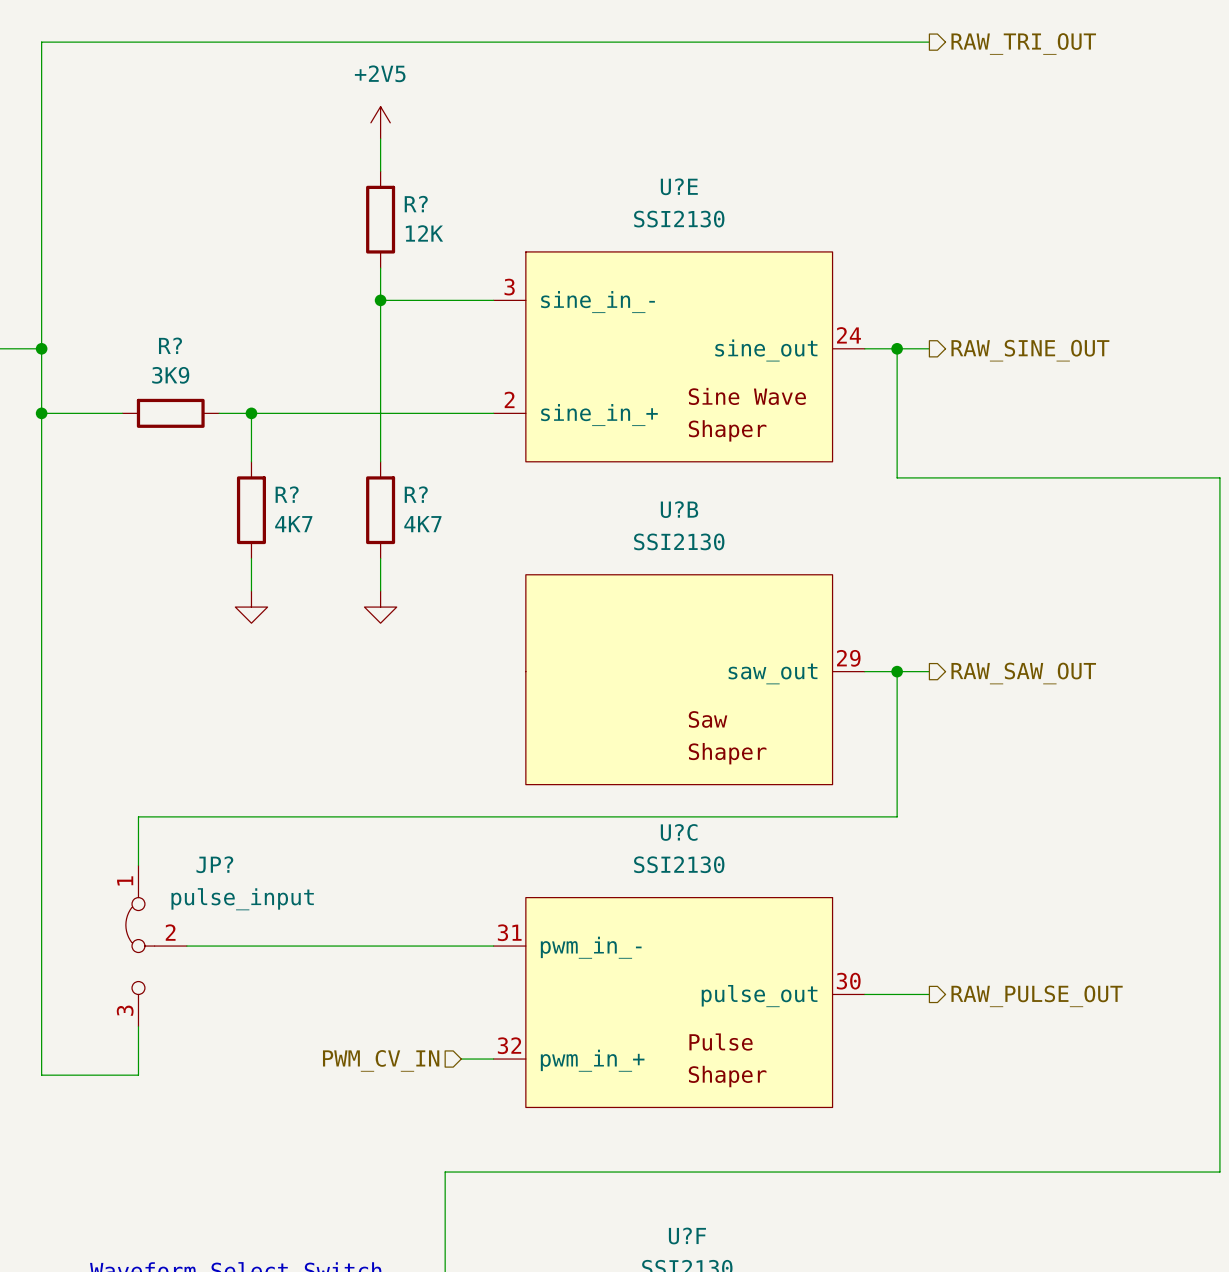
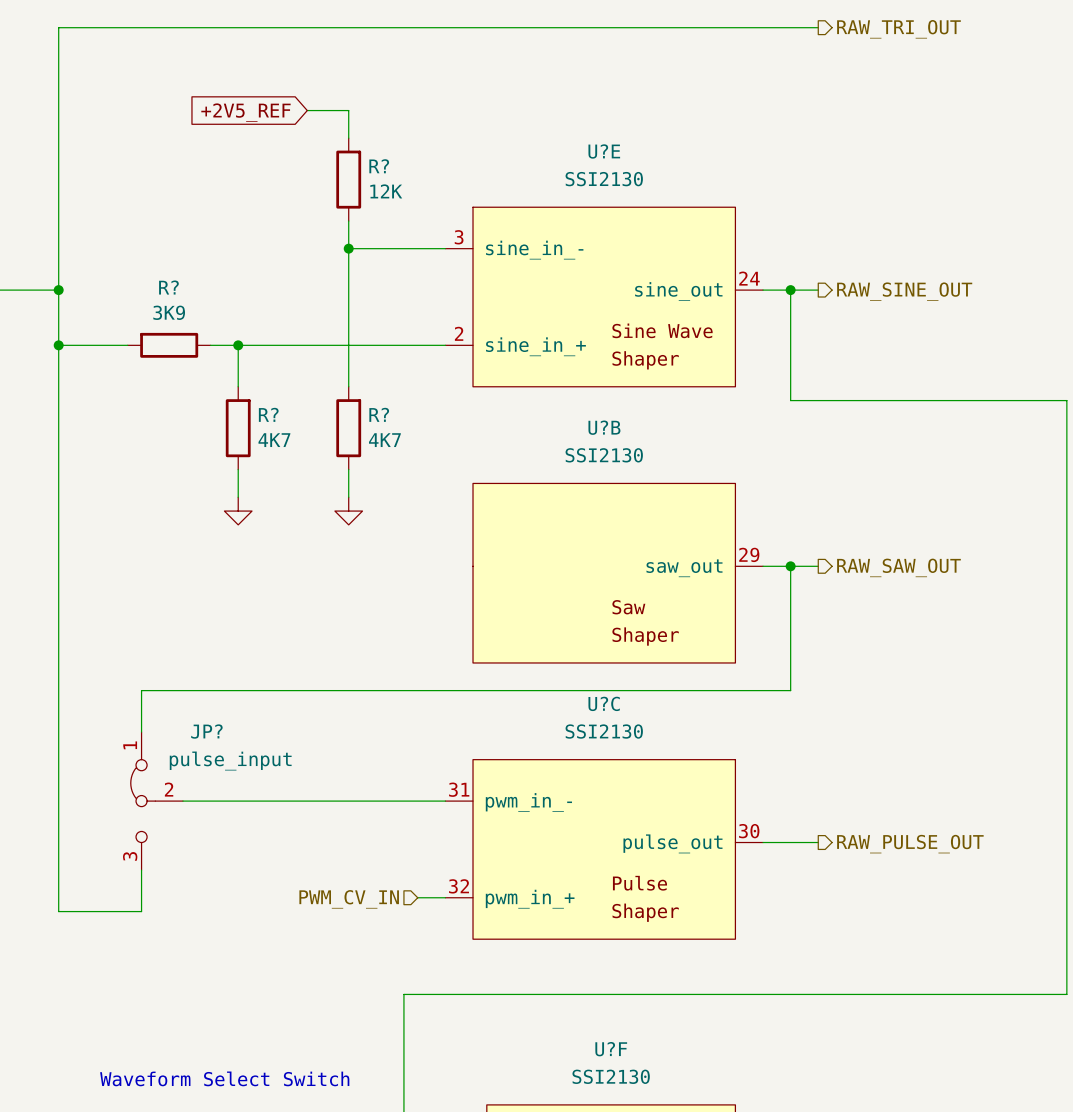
power symbol: +2V5 (380, 122) -> none
wire: none -> (307, 110) (348, 110)
global label: none -> +2V5_REF (245, 112)

